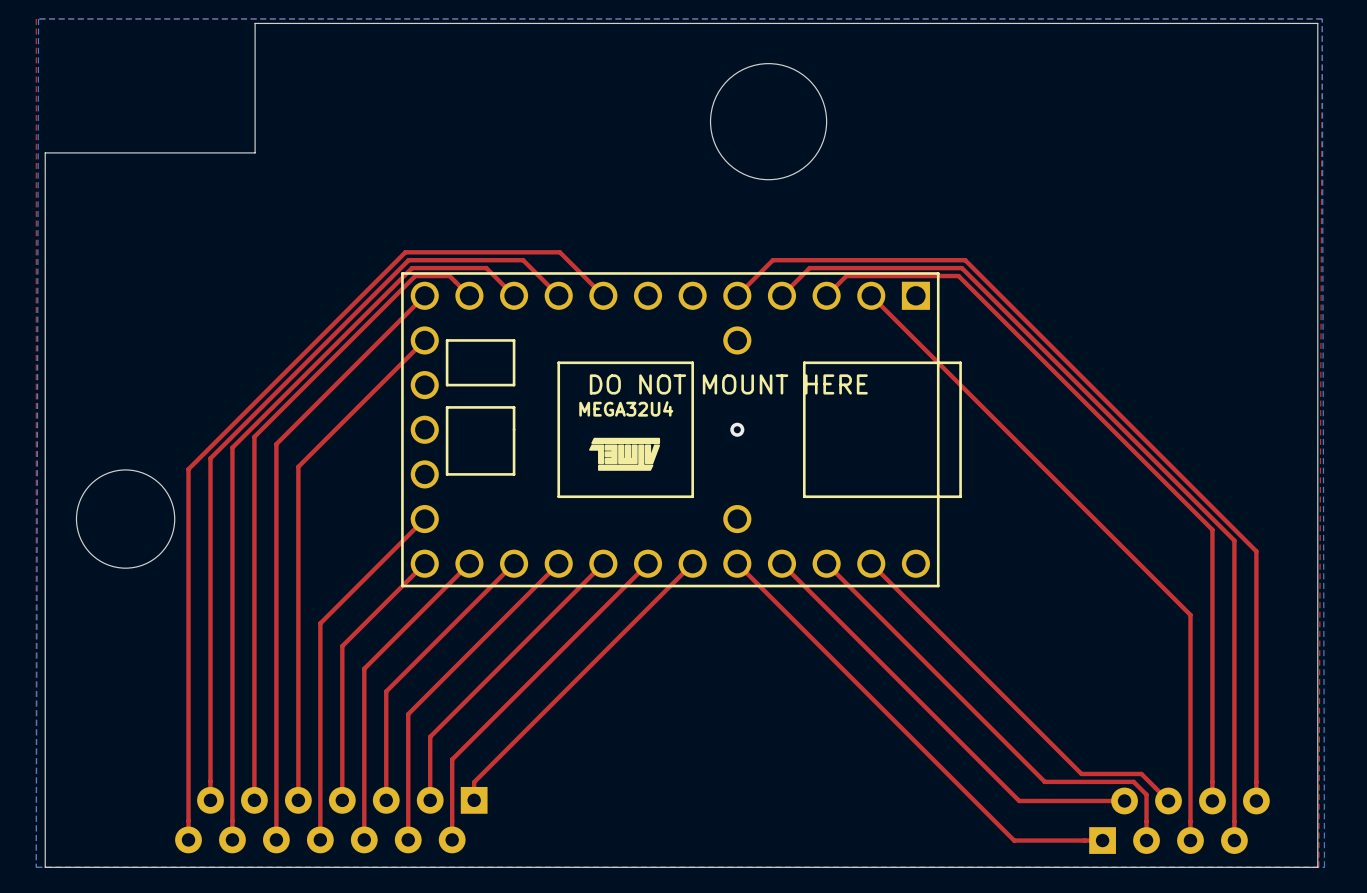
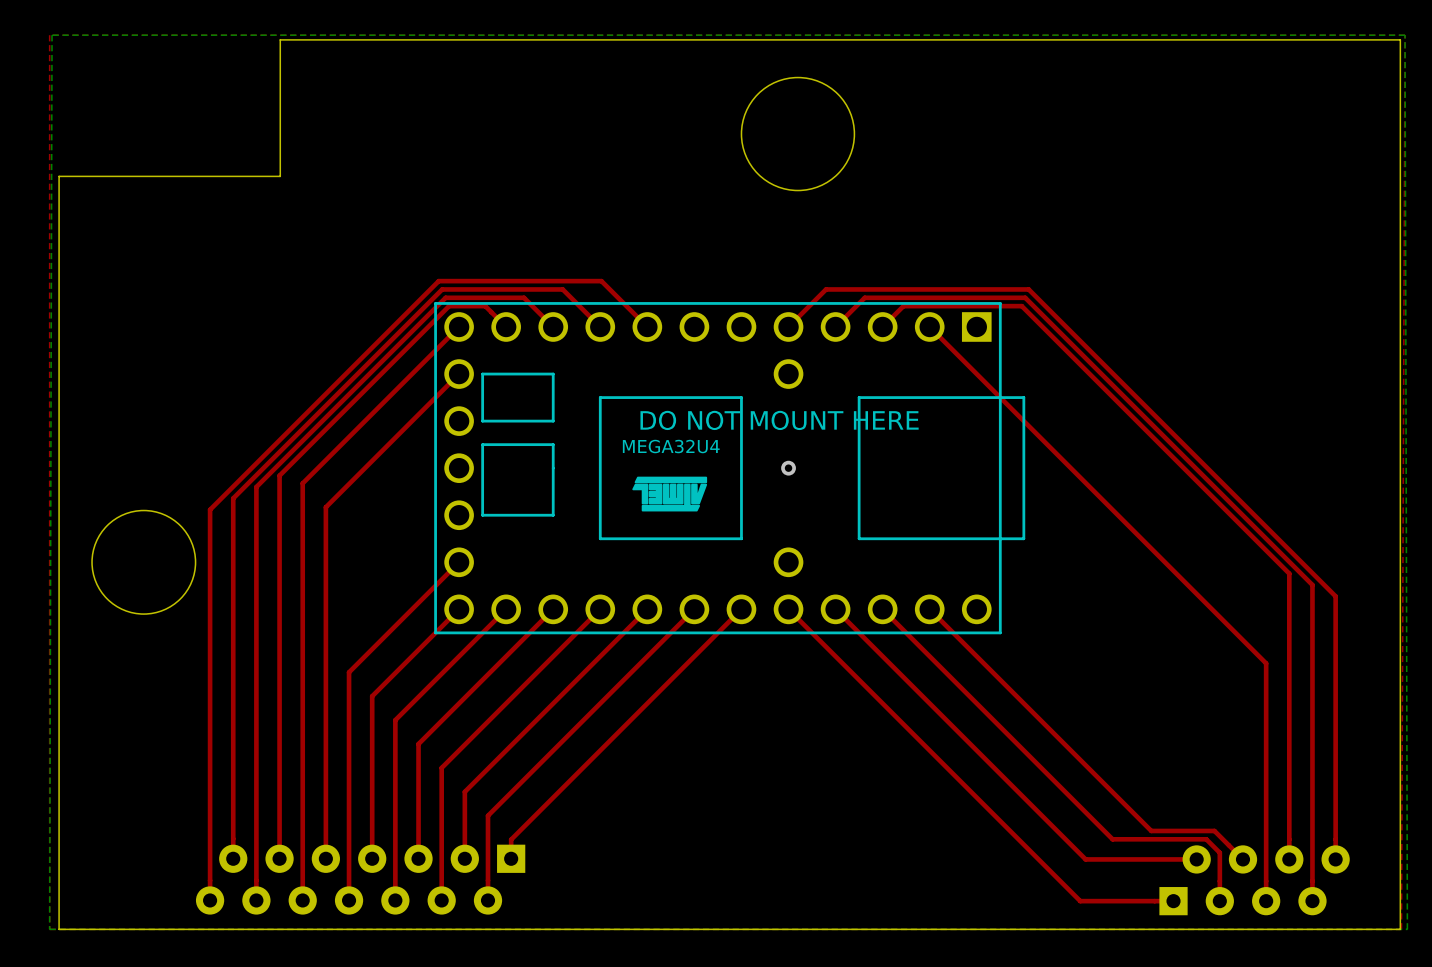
round board edge: none -> [741, 77, 855, 191]
round board edge: [710, 63, 828, 181] -> none

